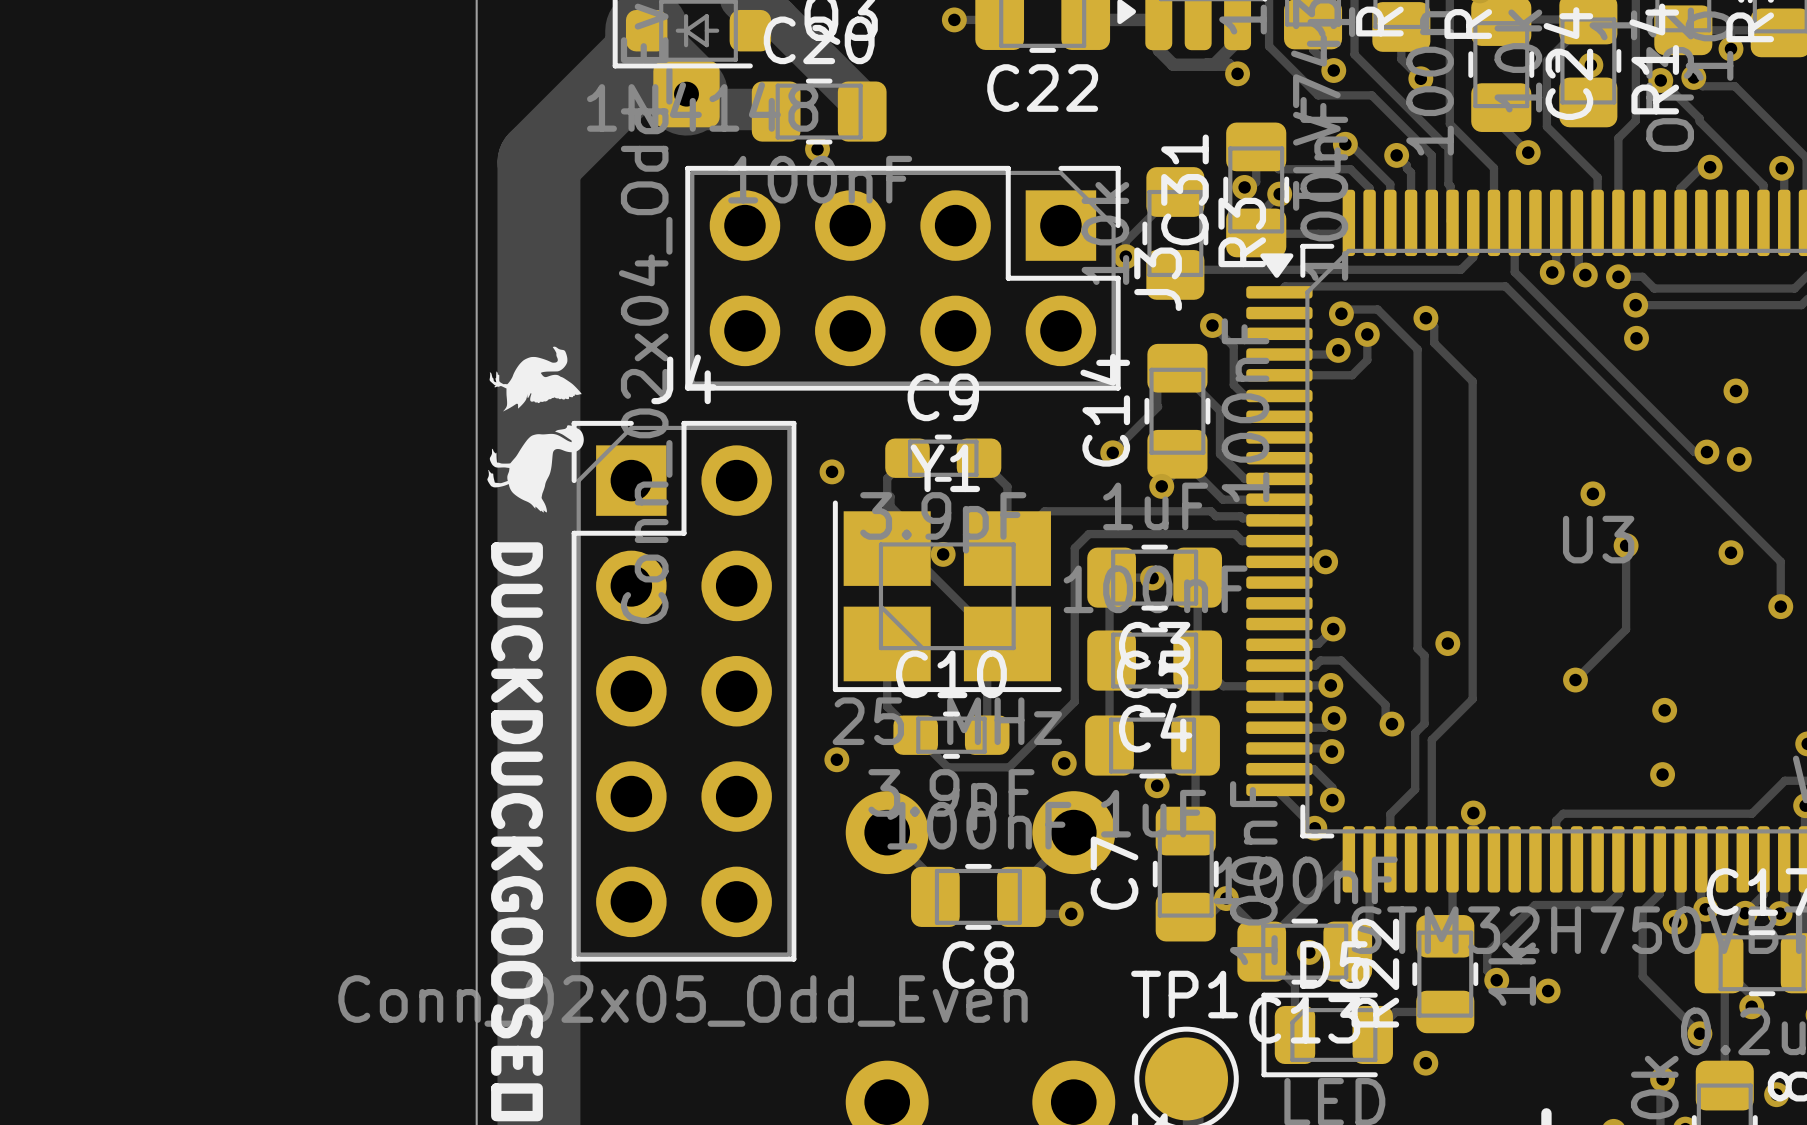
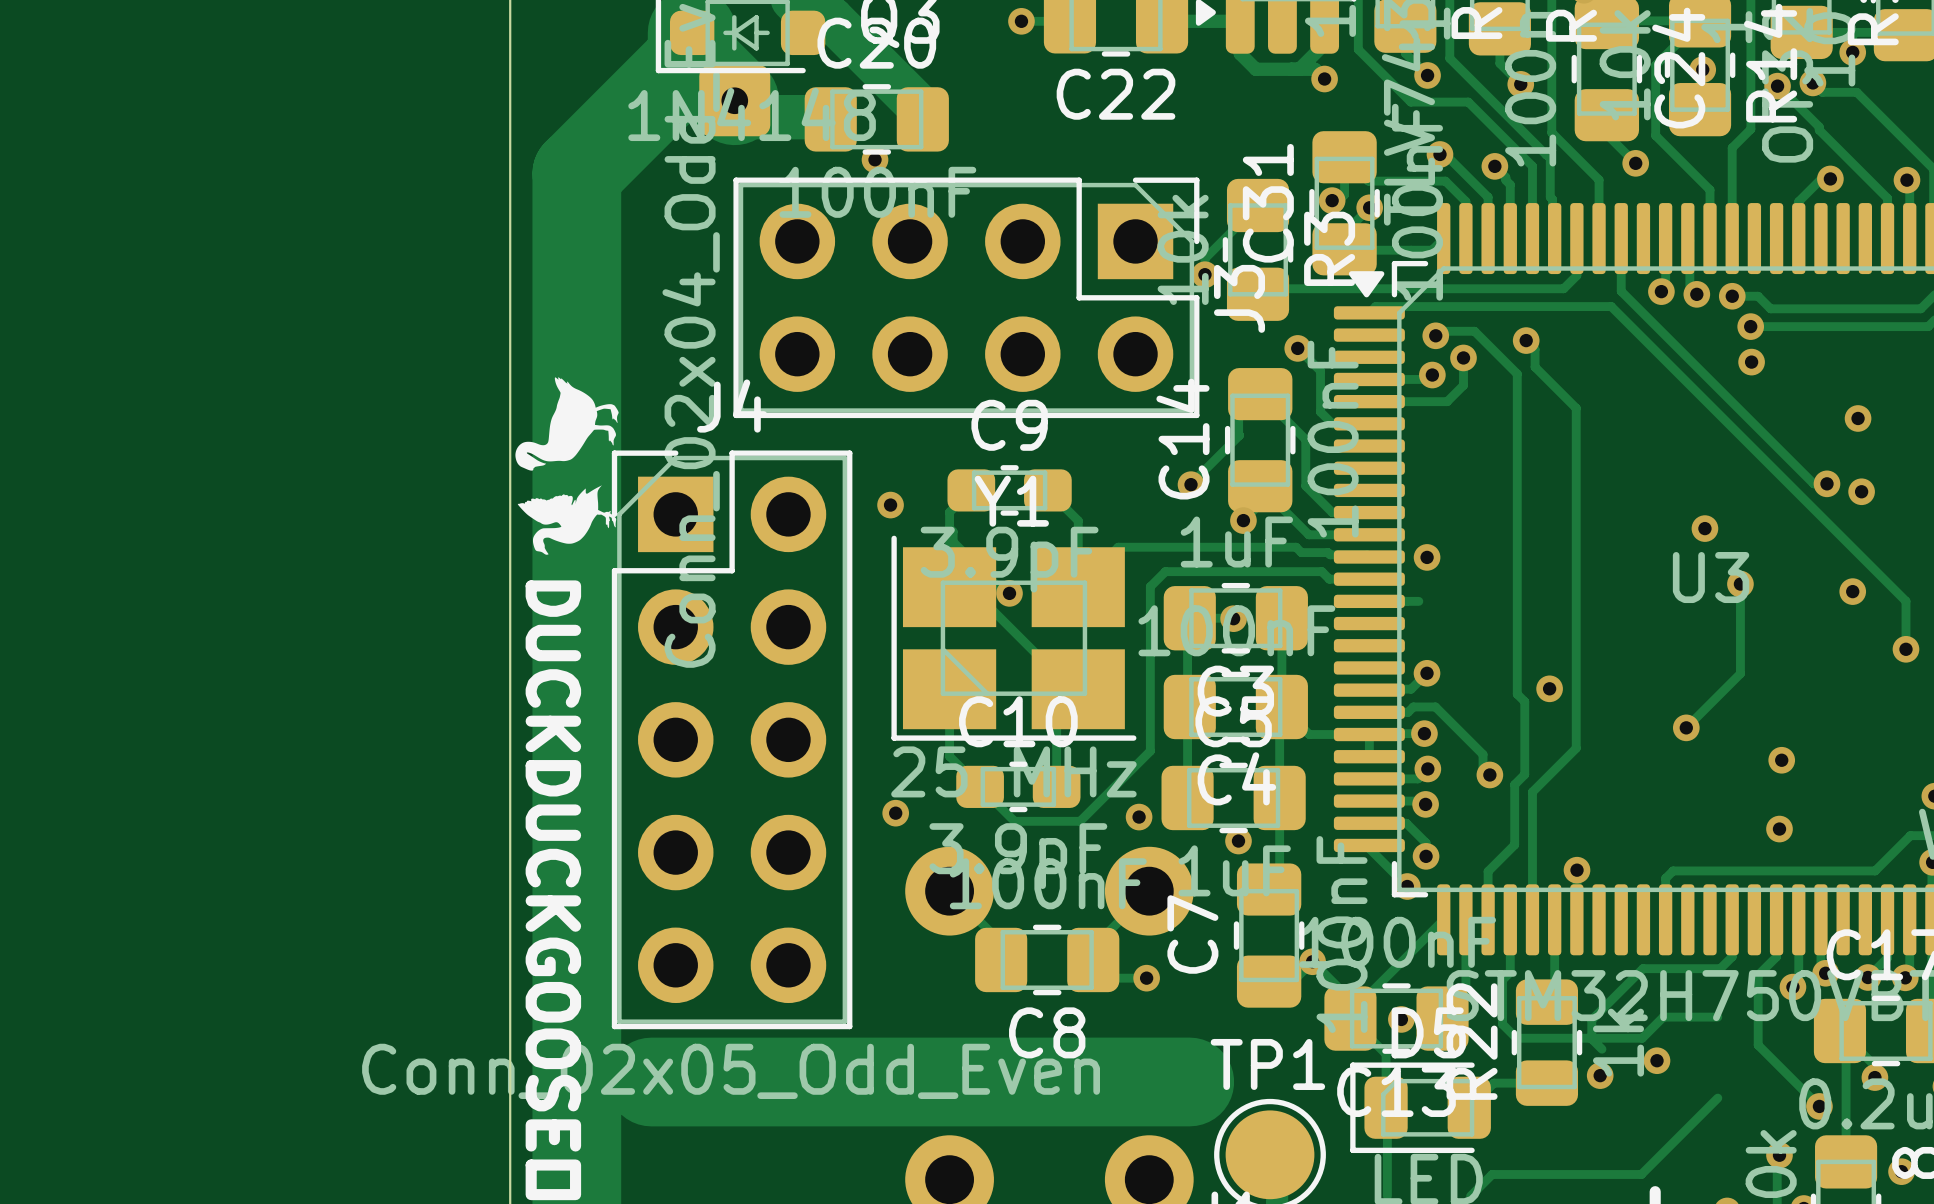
drawing shape: [487, 346, 584, 513] -> [515, 377, 619, 555]
via position: (1325, 561) -> (1427, 557)
track: none -> (1510, 919) (1510, 972) (1502, 980) (1502, 1024) (1516, 1038) (1642, 1038) (1663, 1017) (1717, 1017)
via position: (1496, 980) -> (1600, 1075)
track: none -> (651, 1082) (1189, 1081)
track: none -> (1717, 1098) (1641, 1174) (1492, 1174) (1470, 1196)
track: none -> (1386, 1107) (1387, 1196)
via: (1425, 1063) -> none

